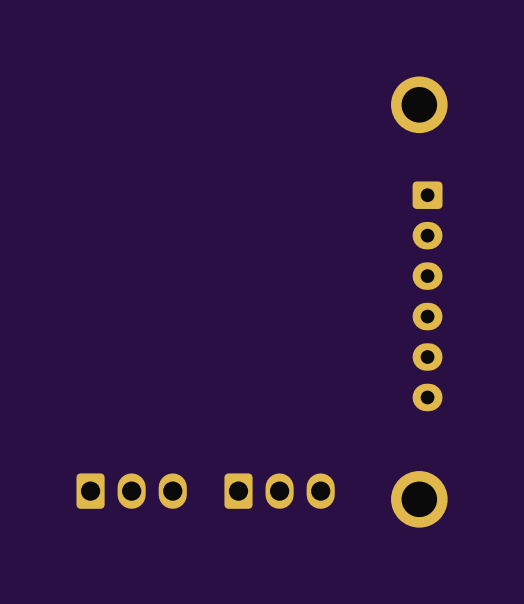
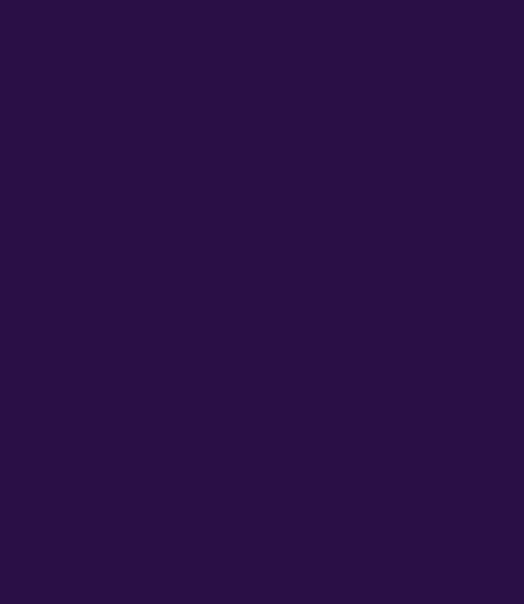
part: (419, 104) -> none
part: (427, 296) -> none
part: (131, 491) -> none
part: (279, 491) -> none
part: (419, 499) -> none

